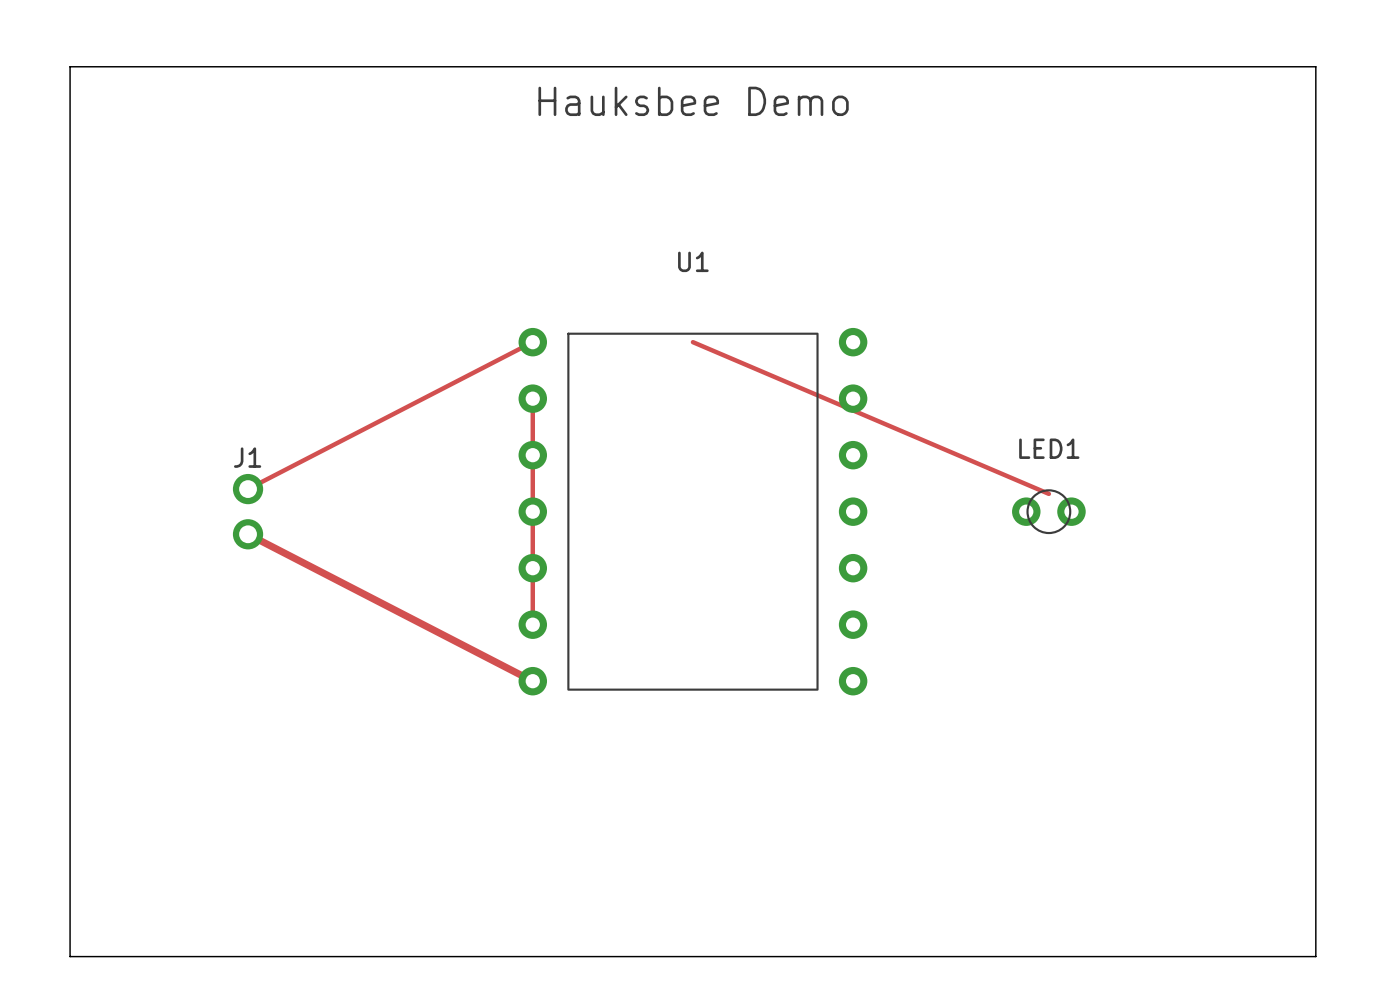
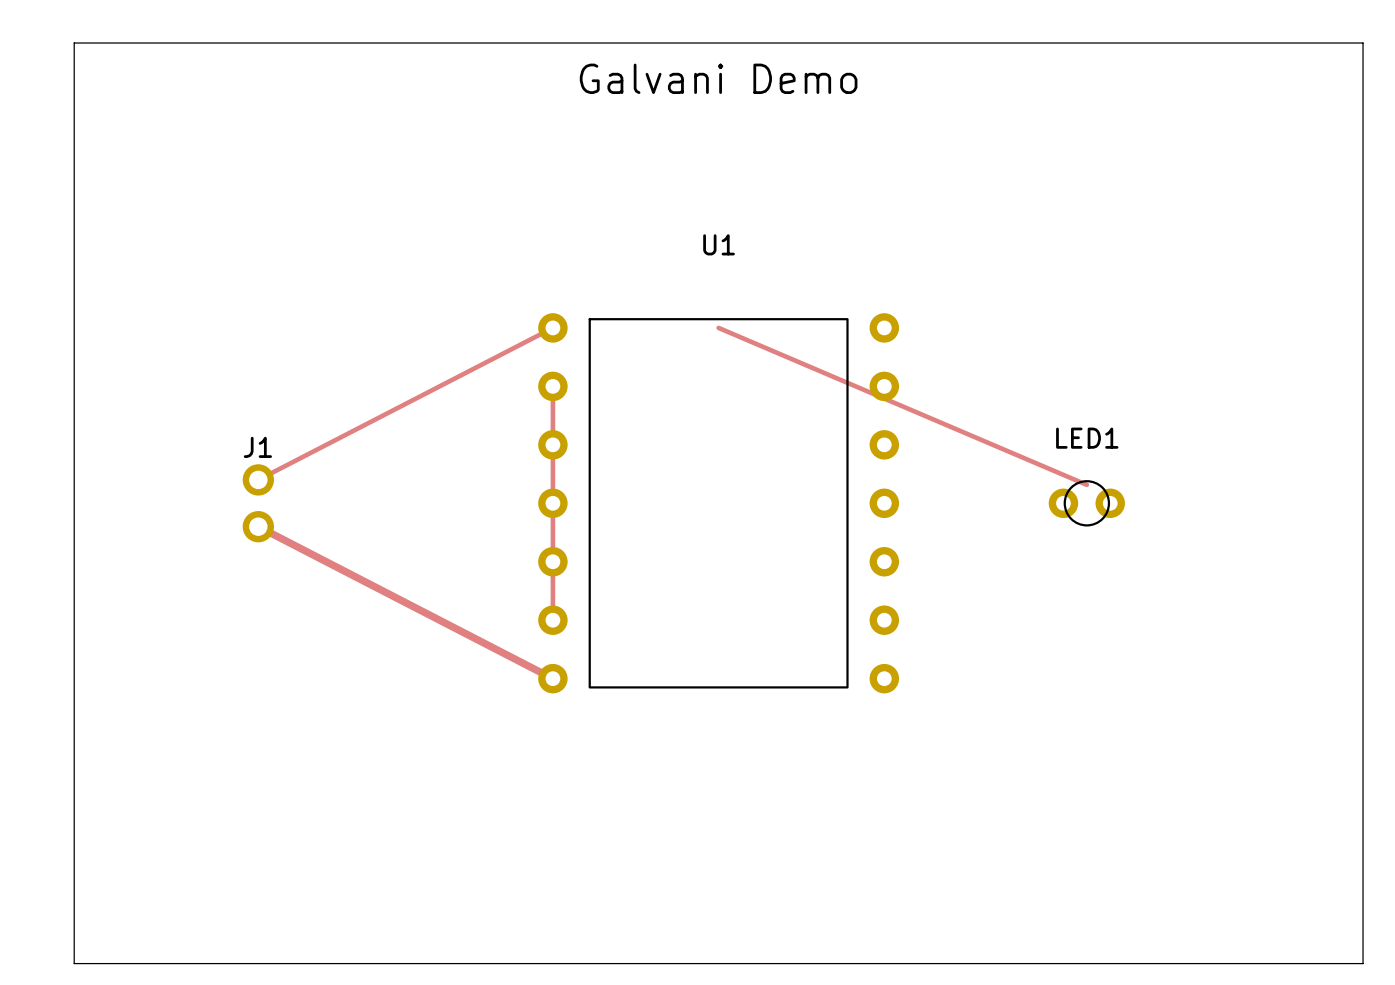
text: Hauksbee Demo (693, 101) -> Galvani Demo (718, 78)

